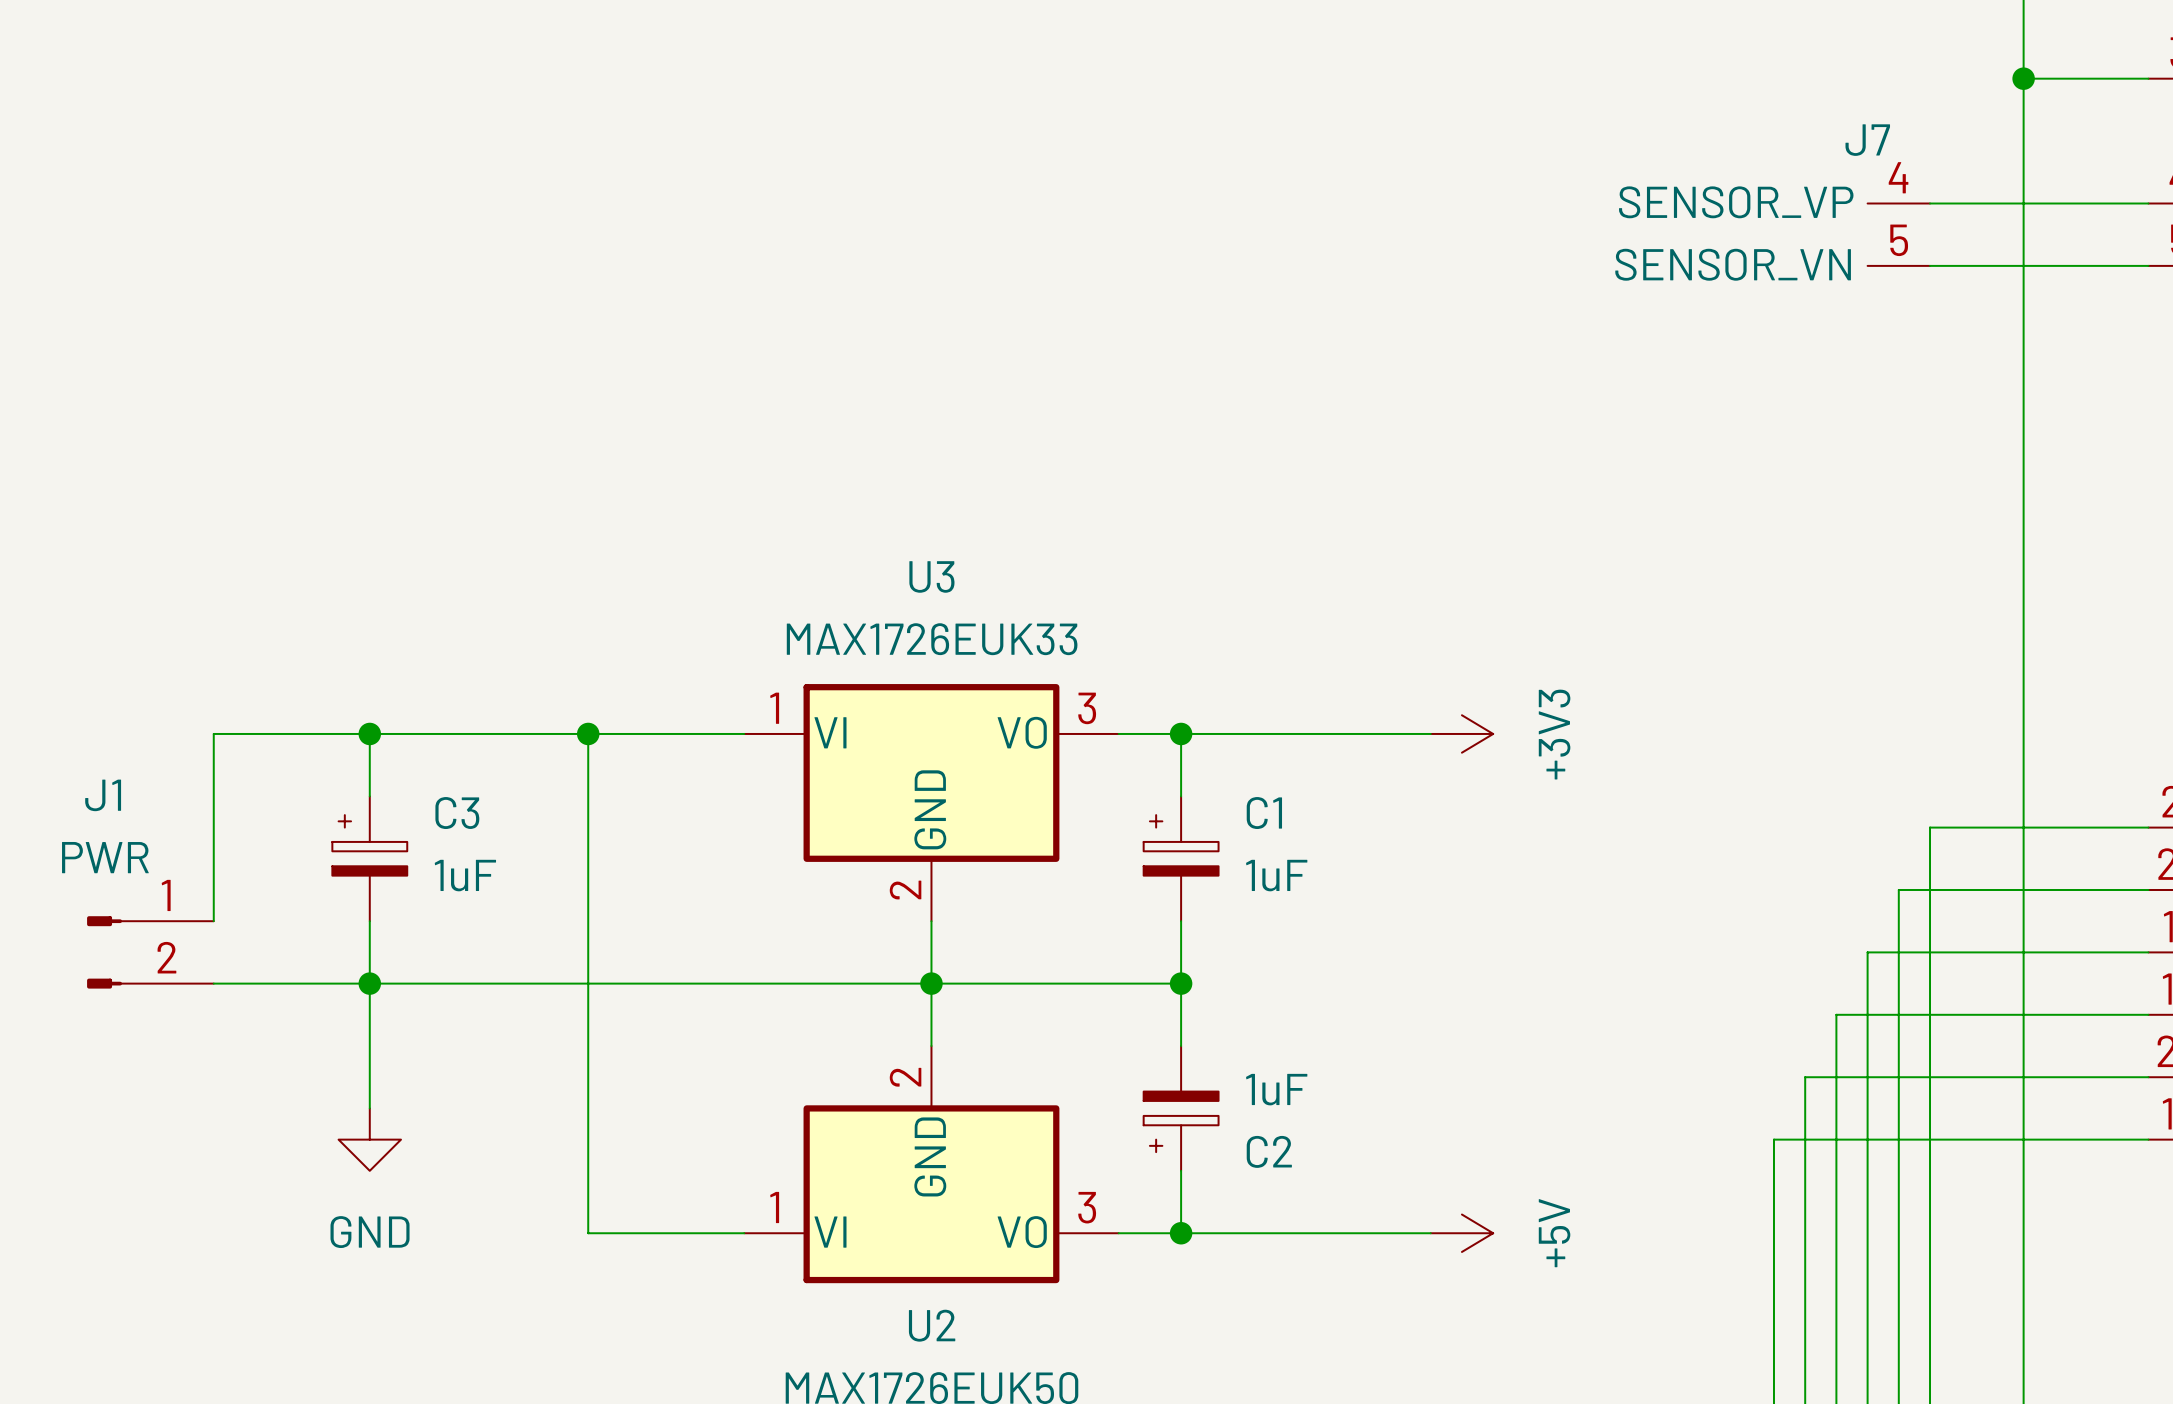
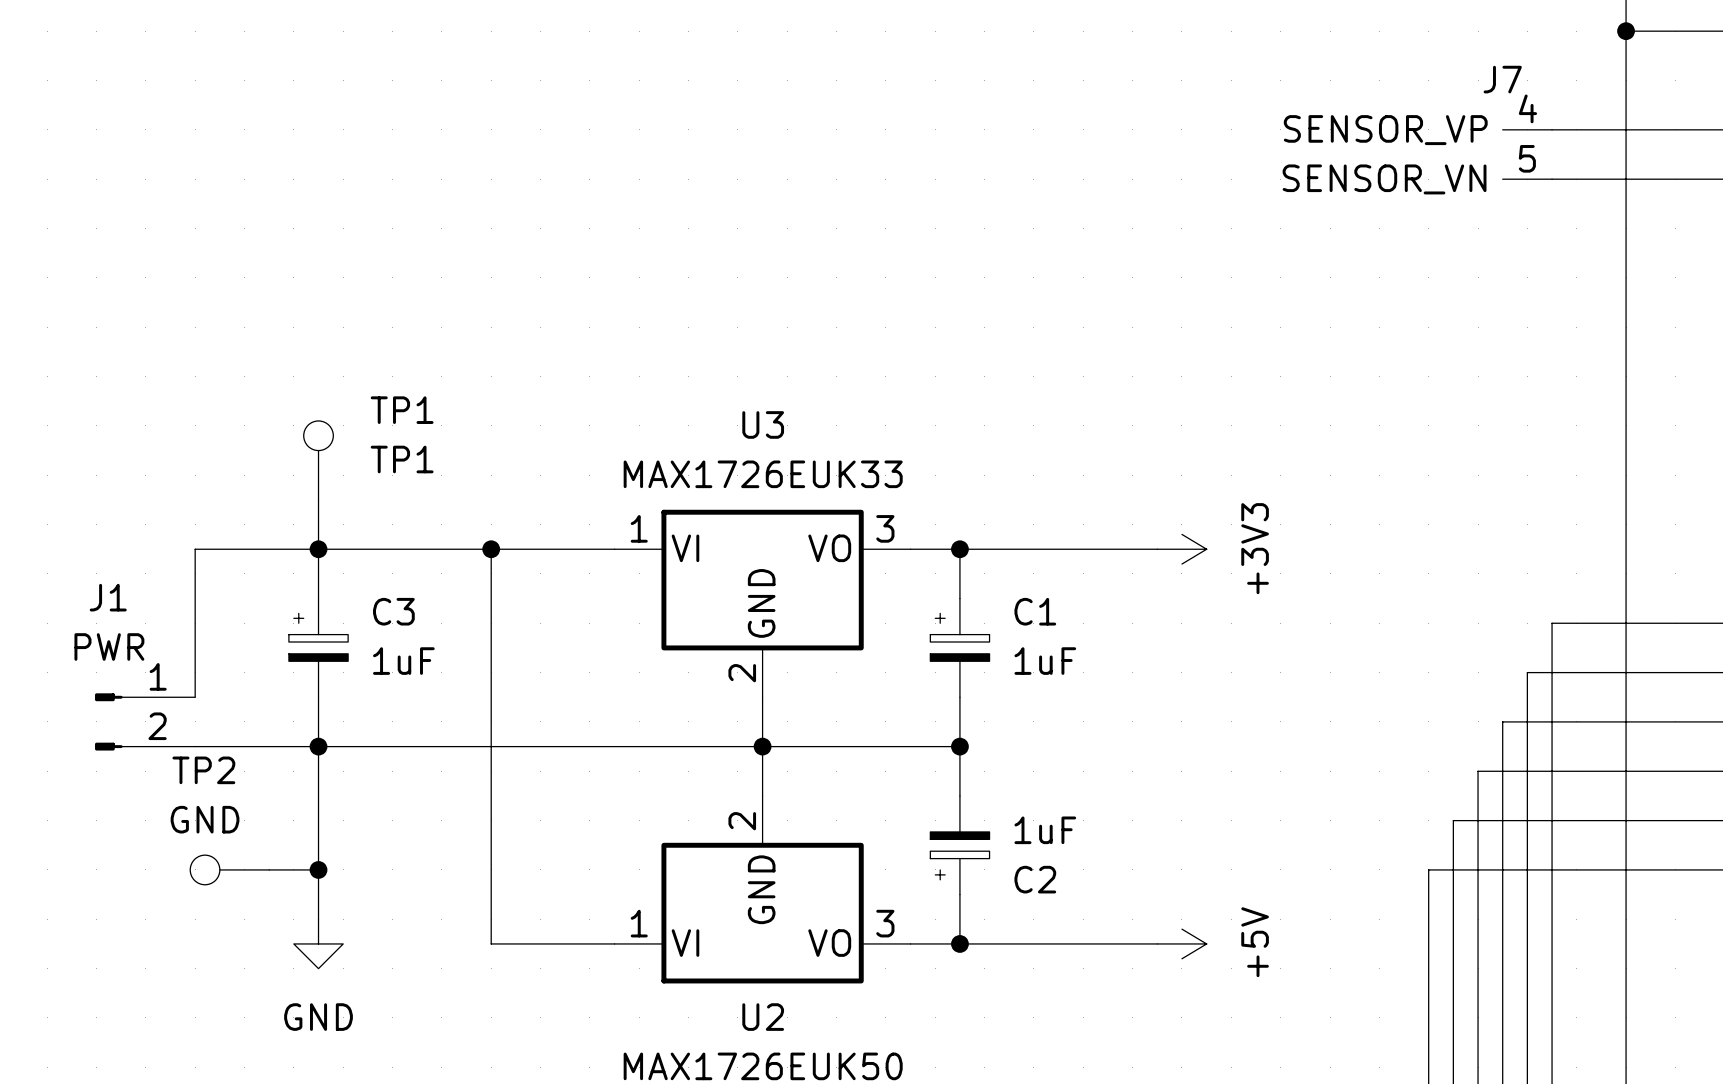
TP1: none -> TP1 (318, 460)
wire: none -> (318, 499) (318, 549)
wire: none -> (318, 845) (318, 919)
TP2: none -> GND (229, 869)
wire: none -> (269, 869) (318, 869)
power symbol position: GND (369, 1139) -> GND (318, 943)
junction: none -> (318, 869)

